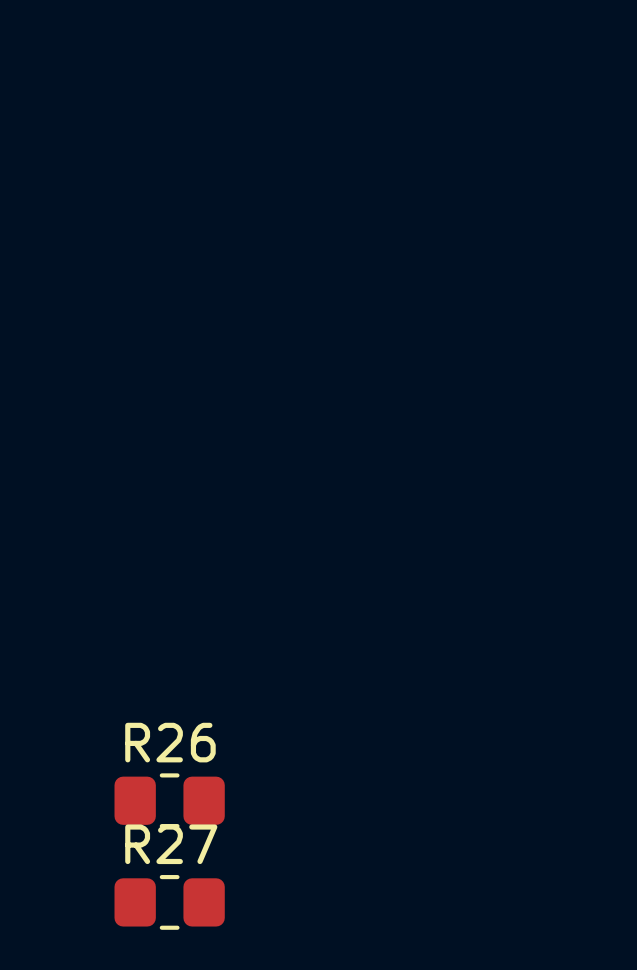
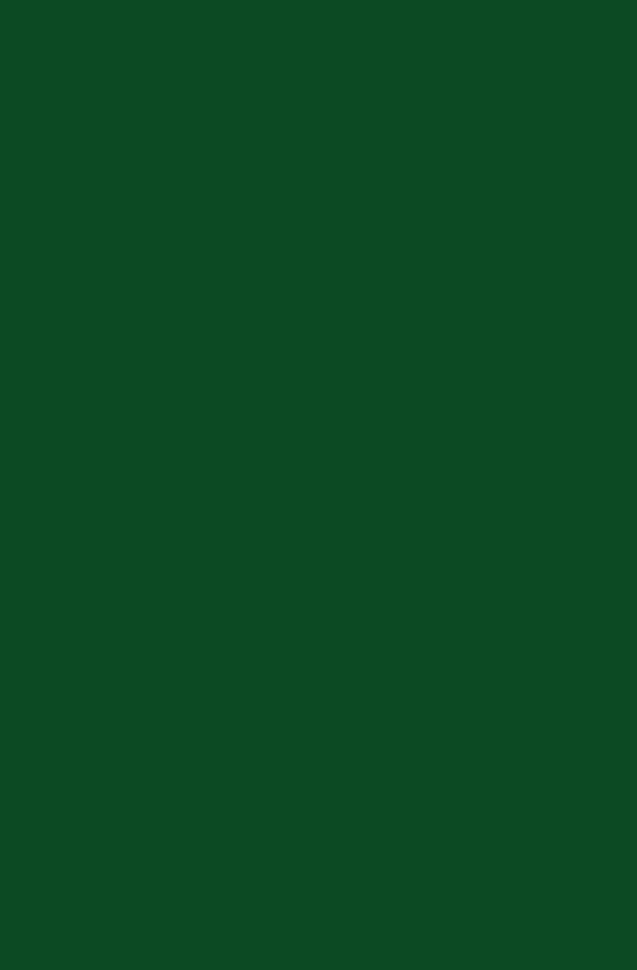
R26: (169, 800) -> none
R27: (169, 902) -> none

